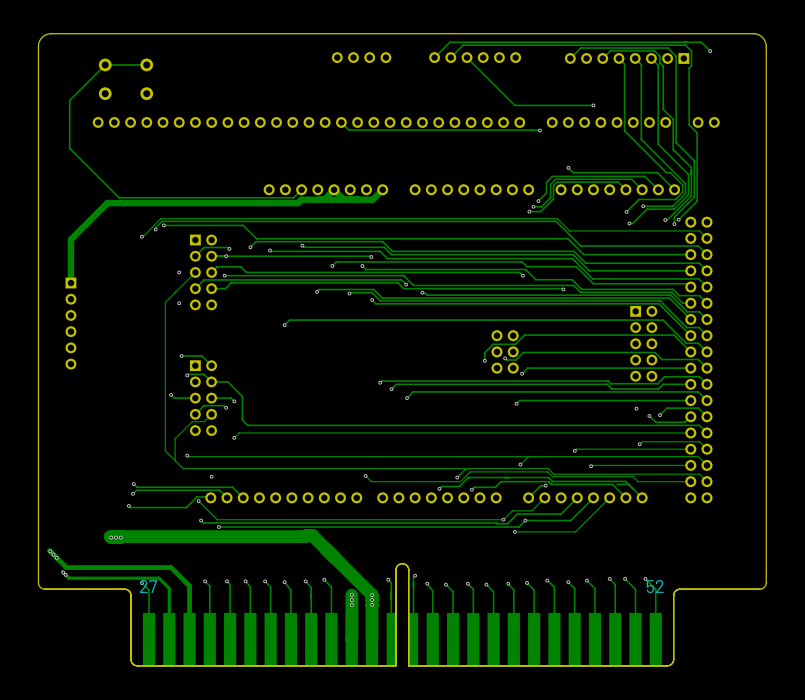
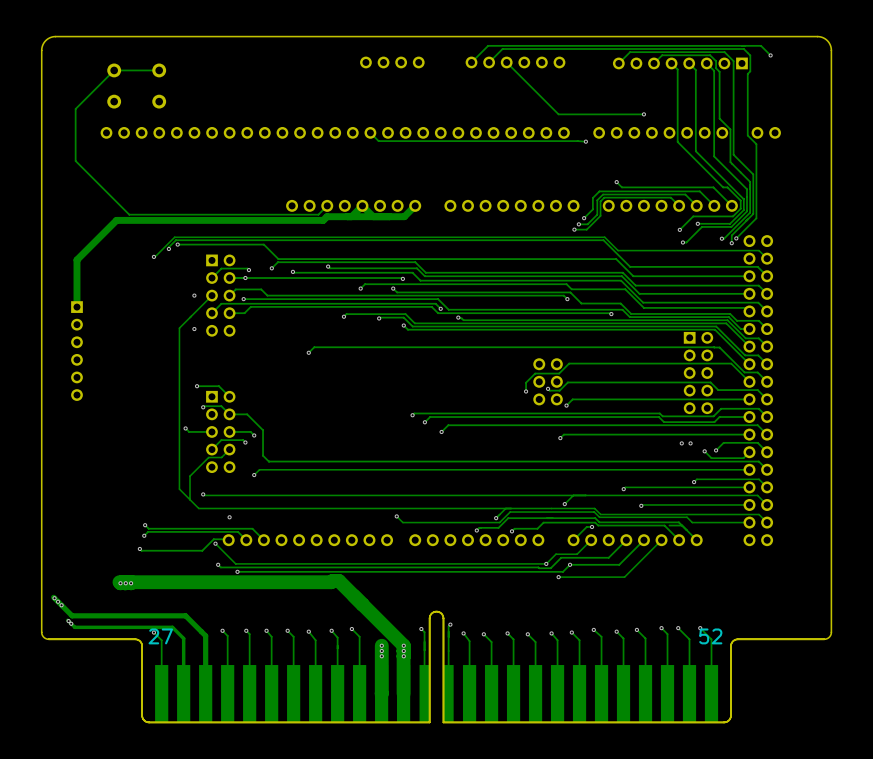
via: none -> (681, 443)

